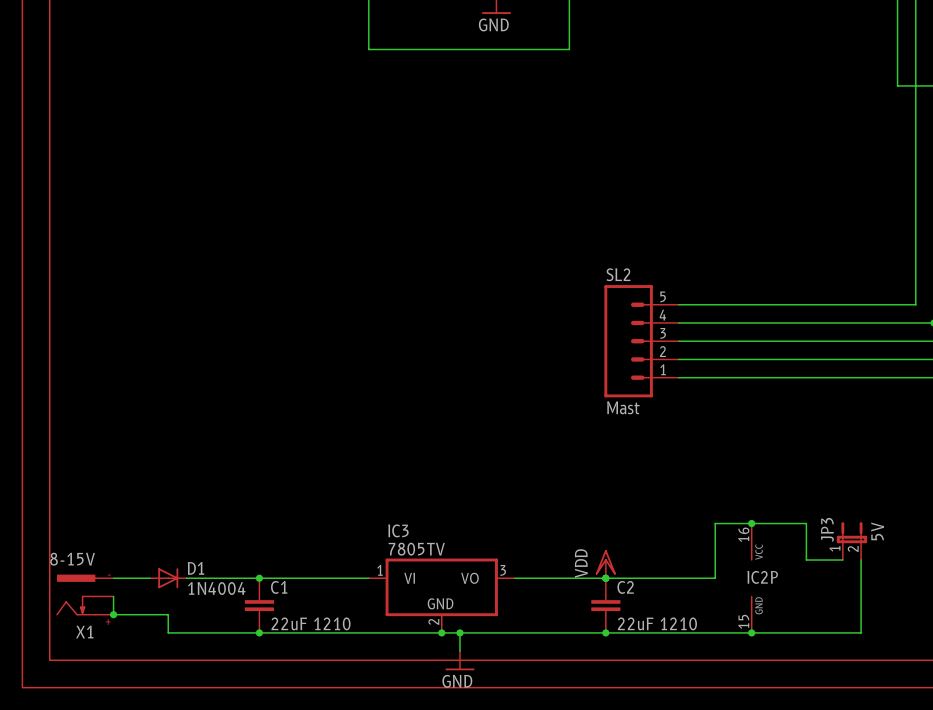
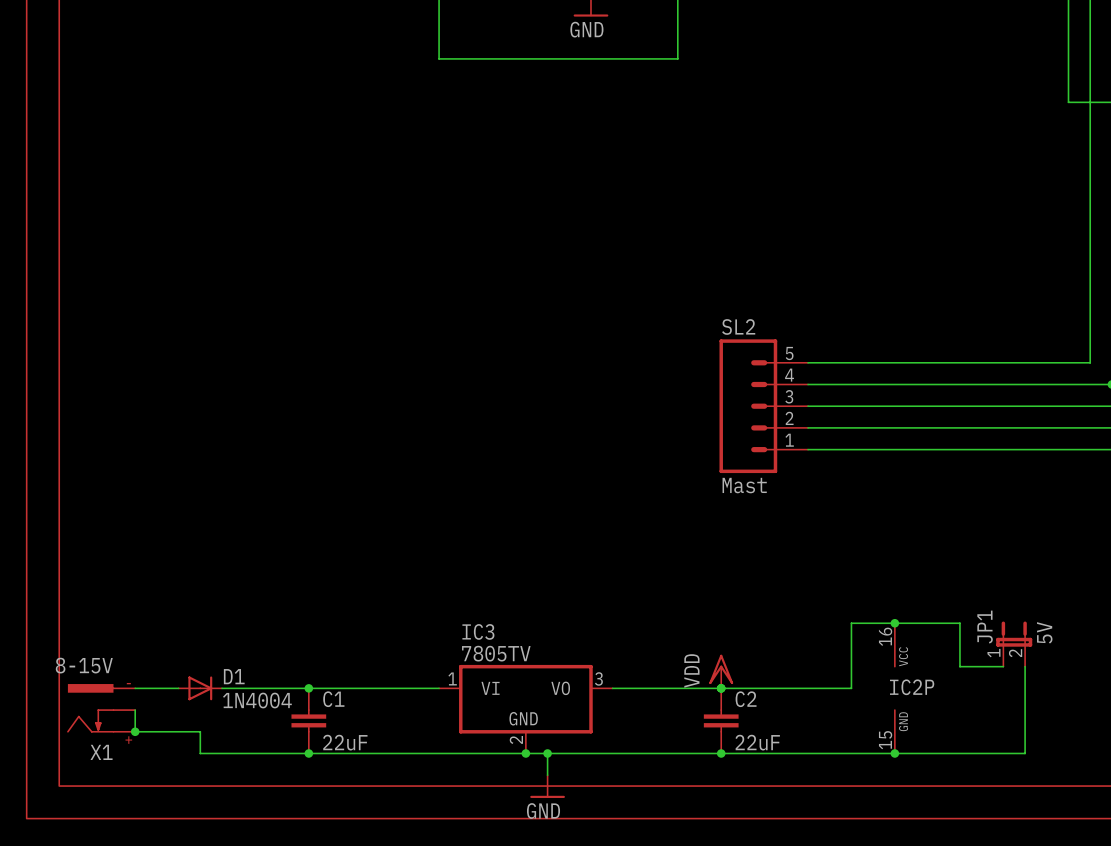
JP3 name: JP3 (827, 529) -> JP1 (985, 627)
C1 value: 22uF 1210 (311, 623) -> 22uF (345, 742)
C2 value: 22uF 1210 (657, 623) -> 22uF (757, 742)

